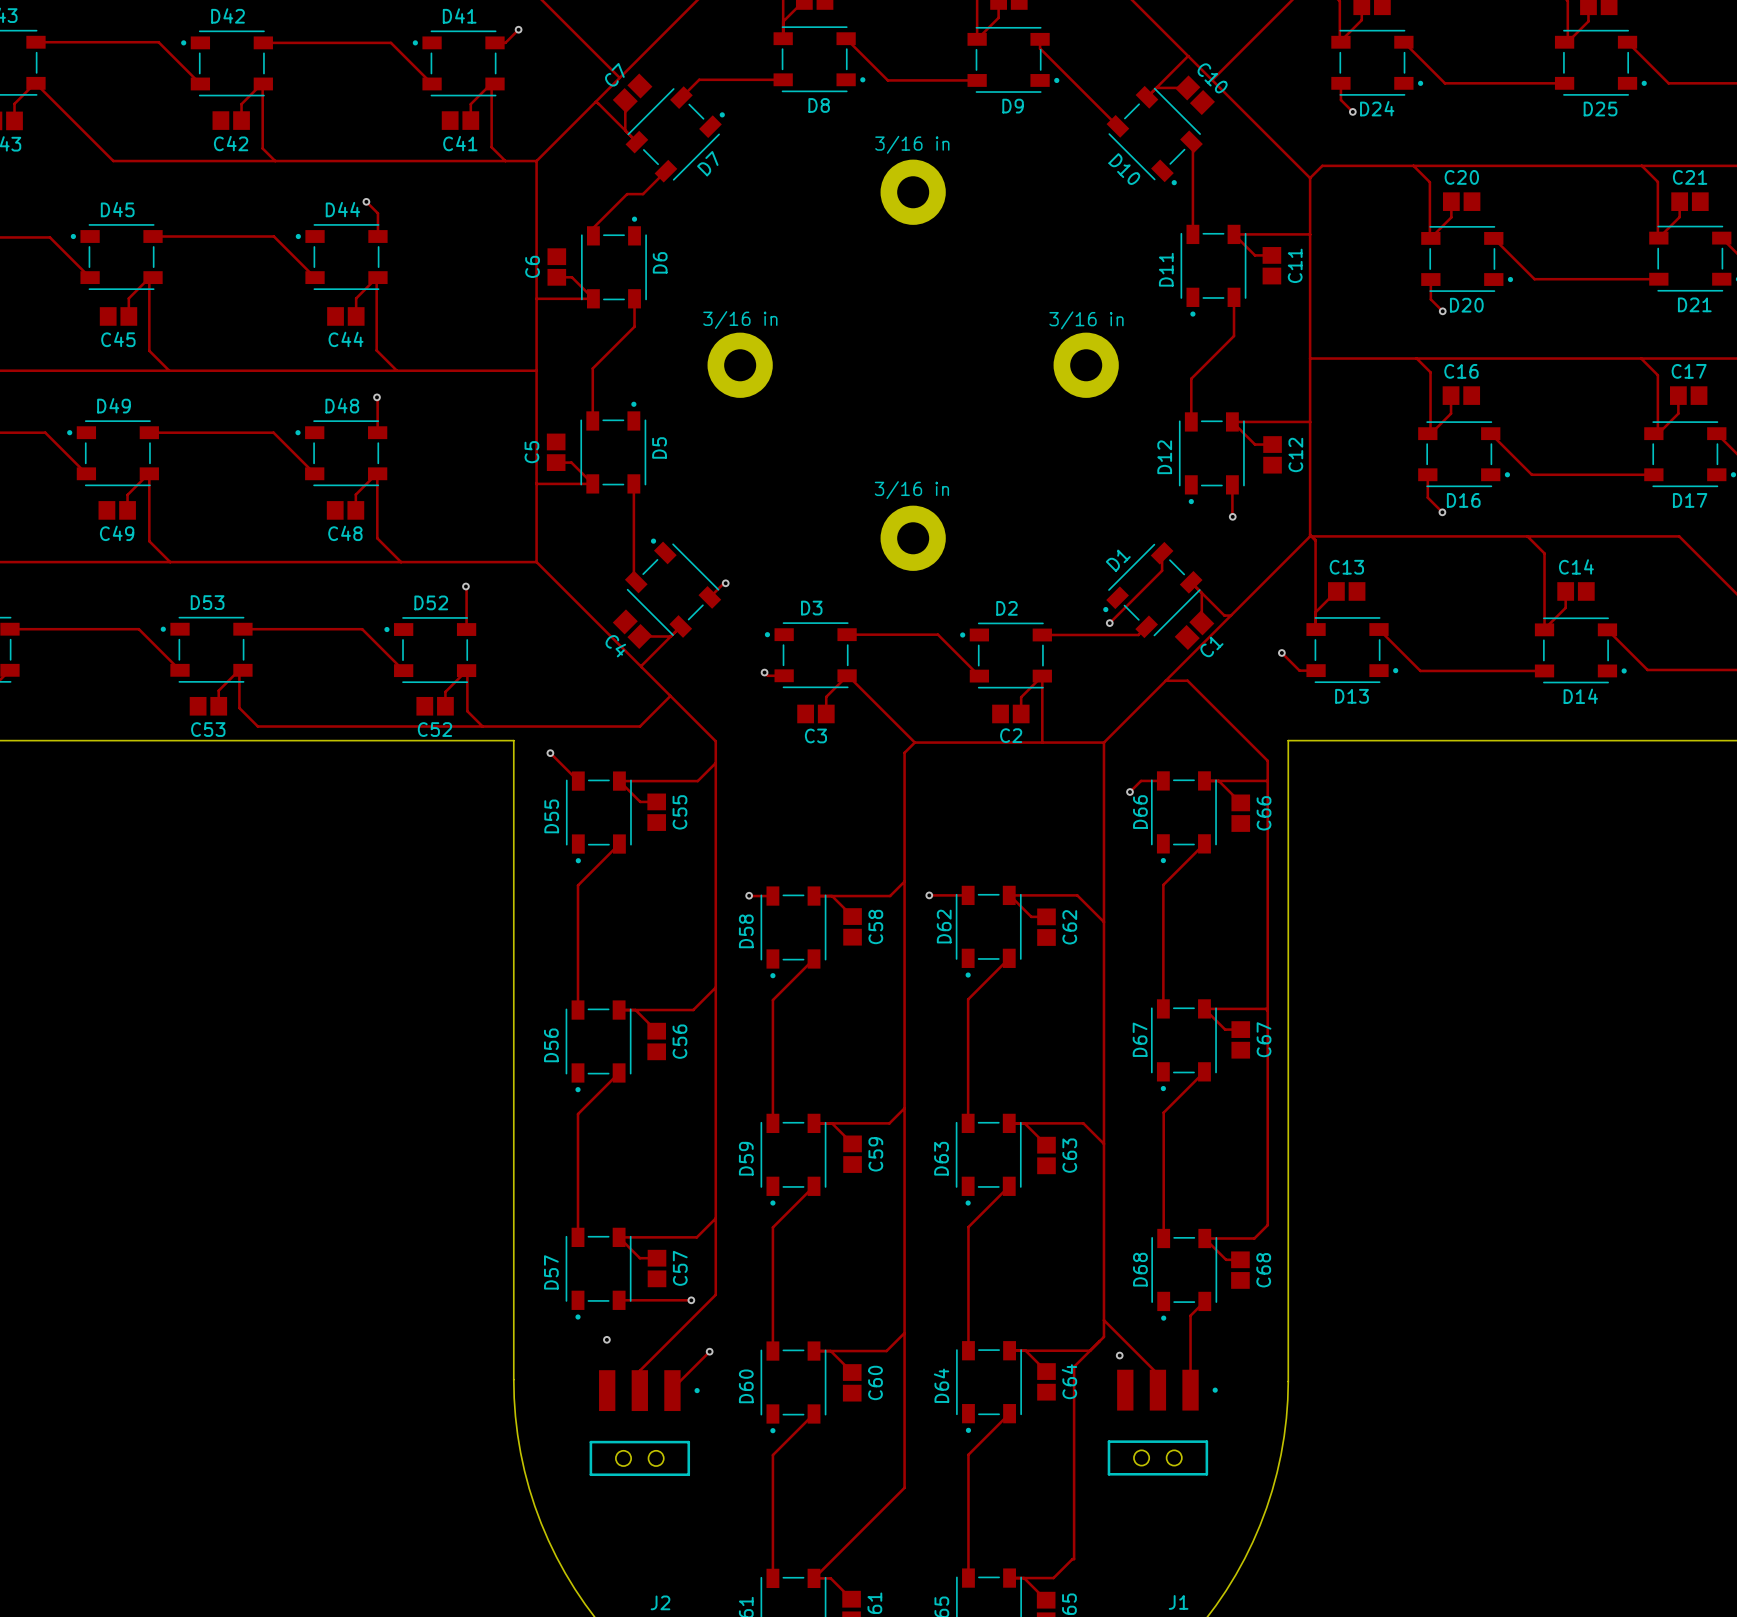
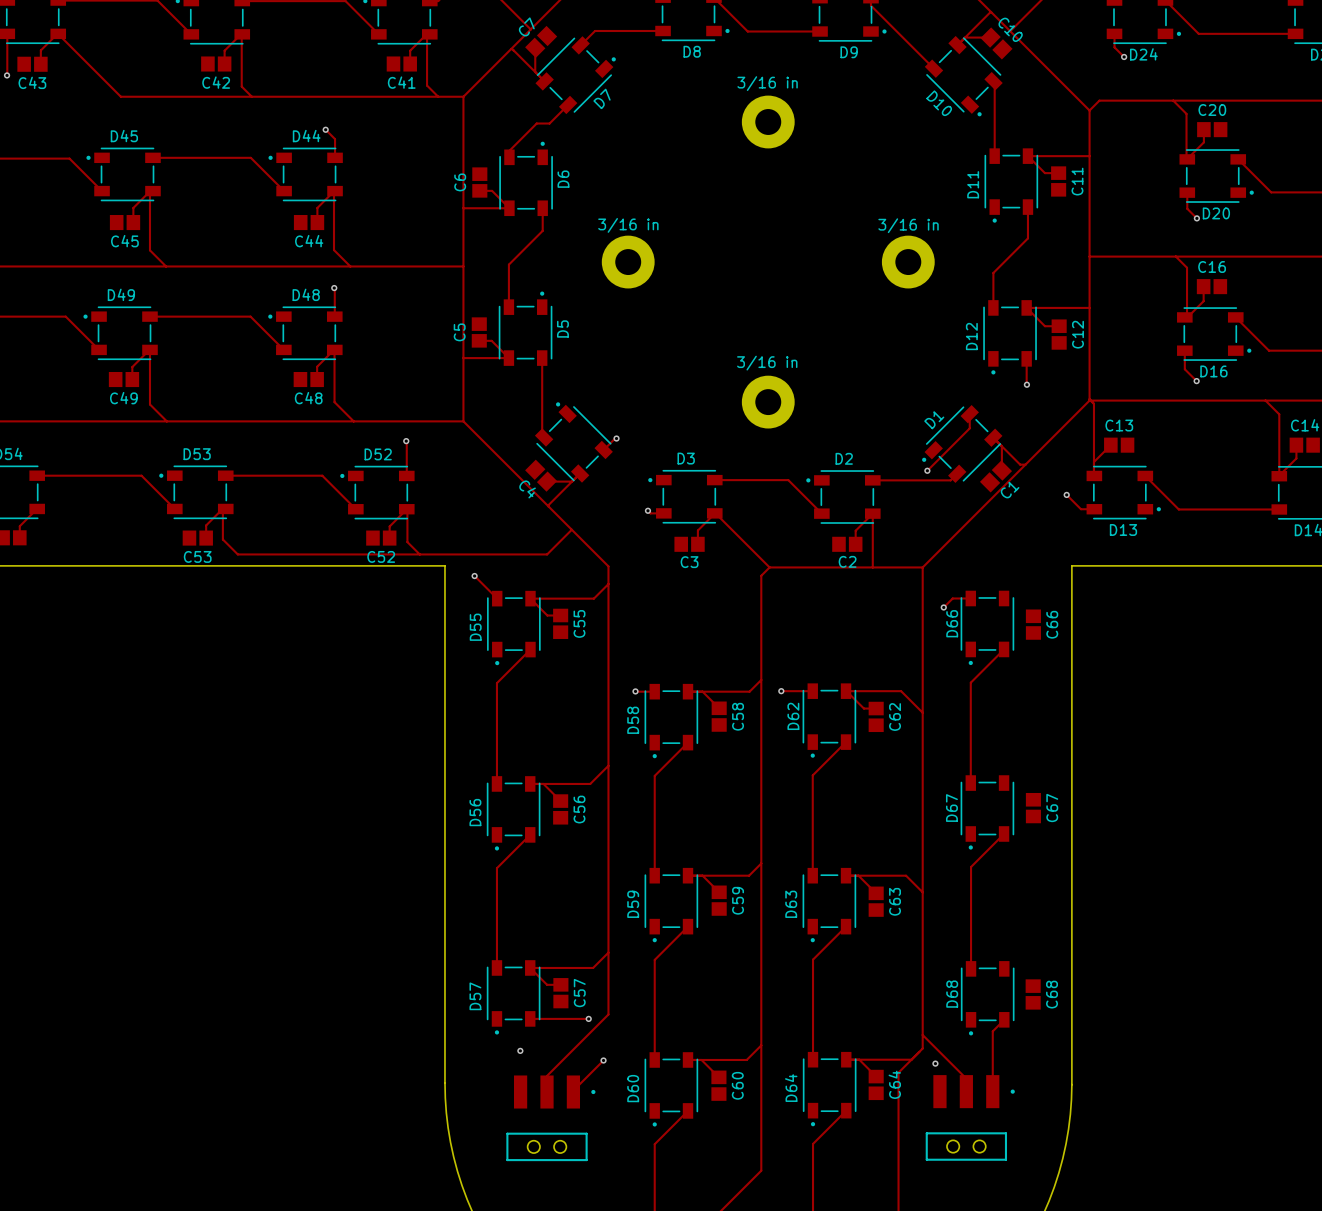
track: (1165, 680) (1187, 680) (1267, 760) (1267, 1225) (1254, 1238) (1204, 1238) (1226, 1259) (1240, 1259) -> none
track: (1218, 780) (1240, 802) -> none
track: (1267, 780) (1204, 780) -> none
track: (1267, 1010) (1265, 1008) (1204, 1008) (1225, 1029) (1240, 1029) -> none

